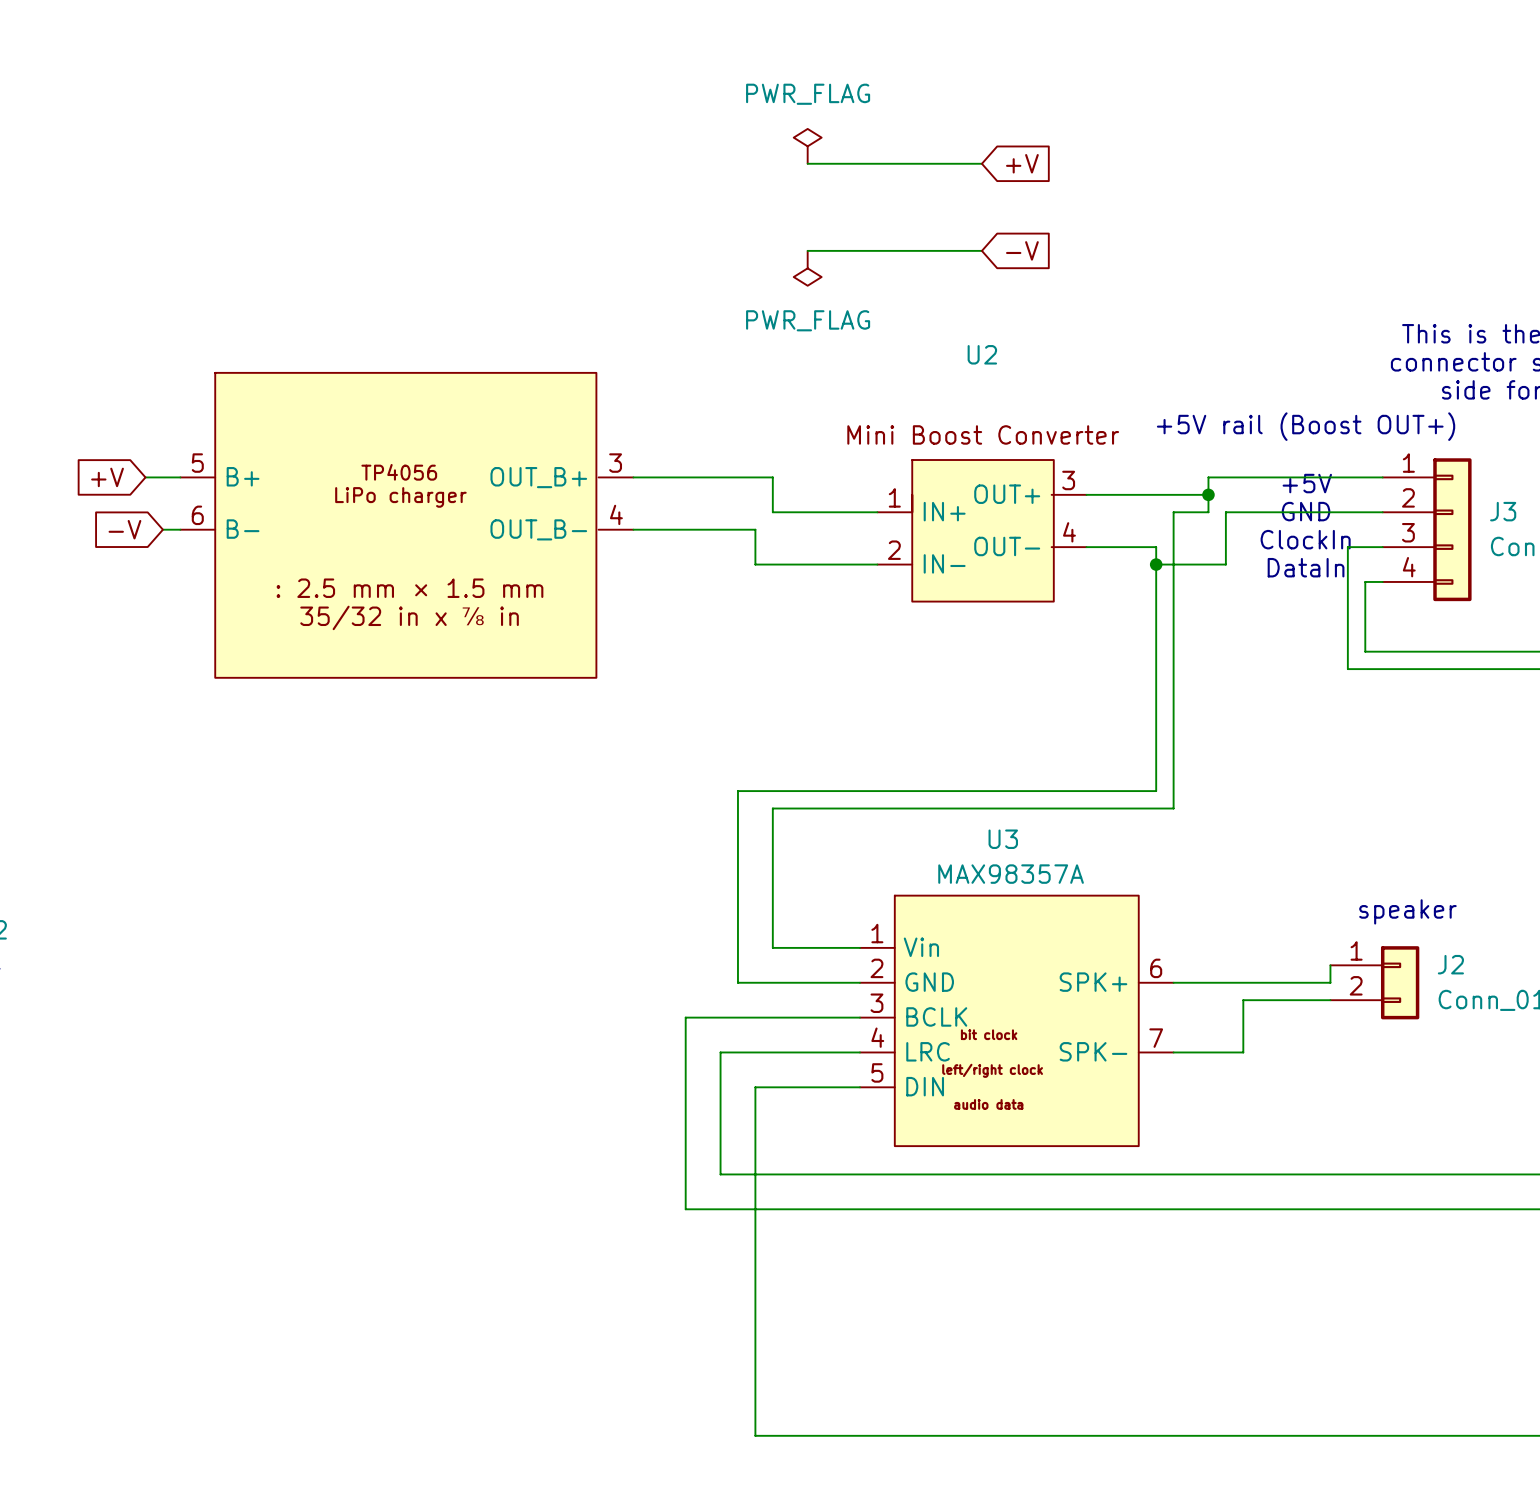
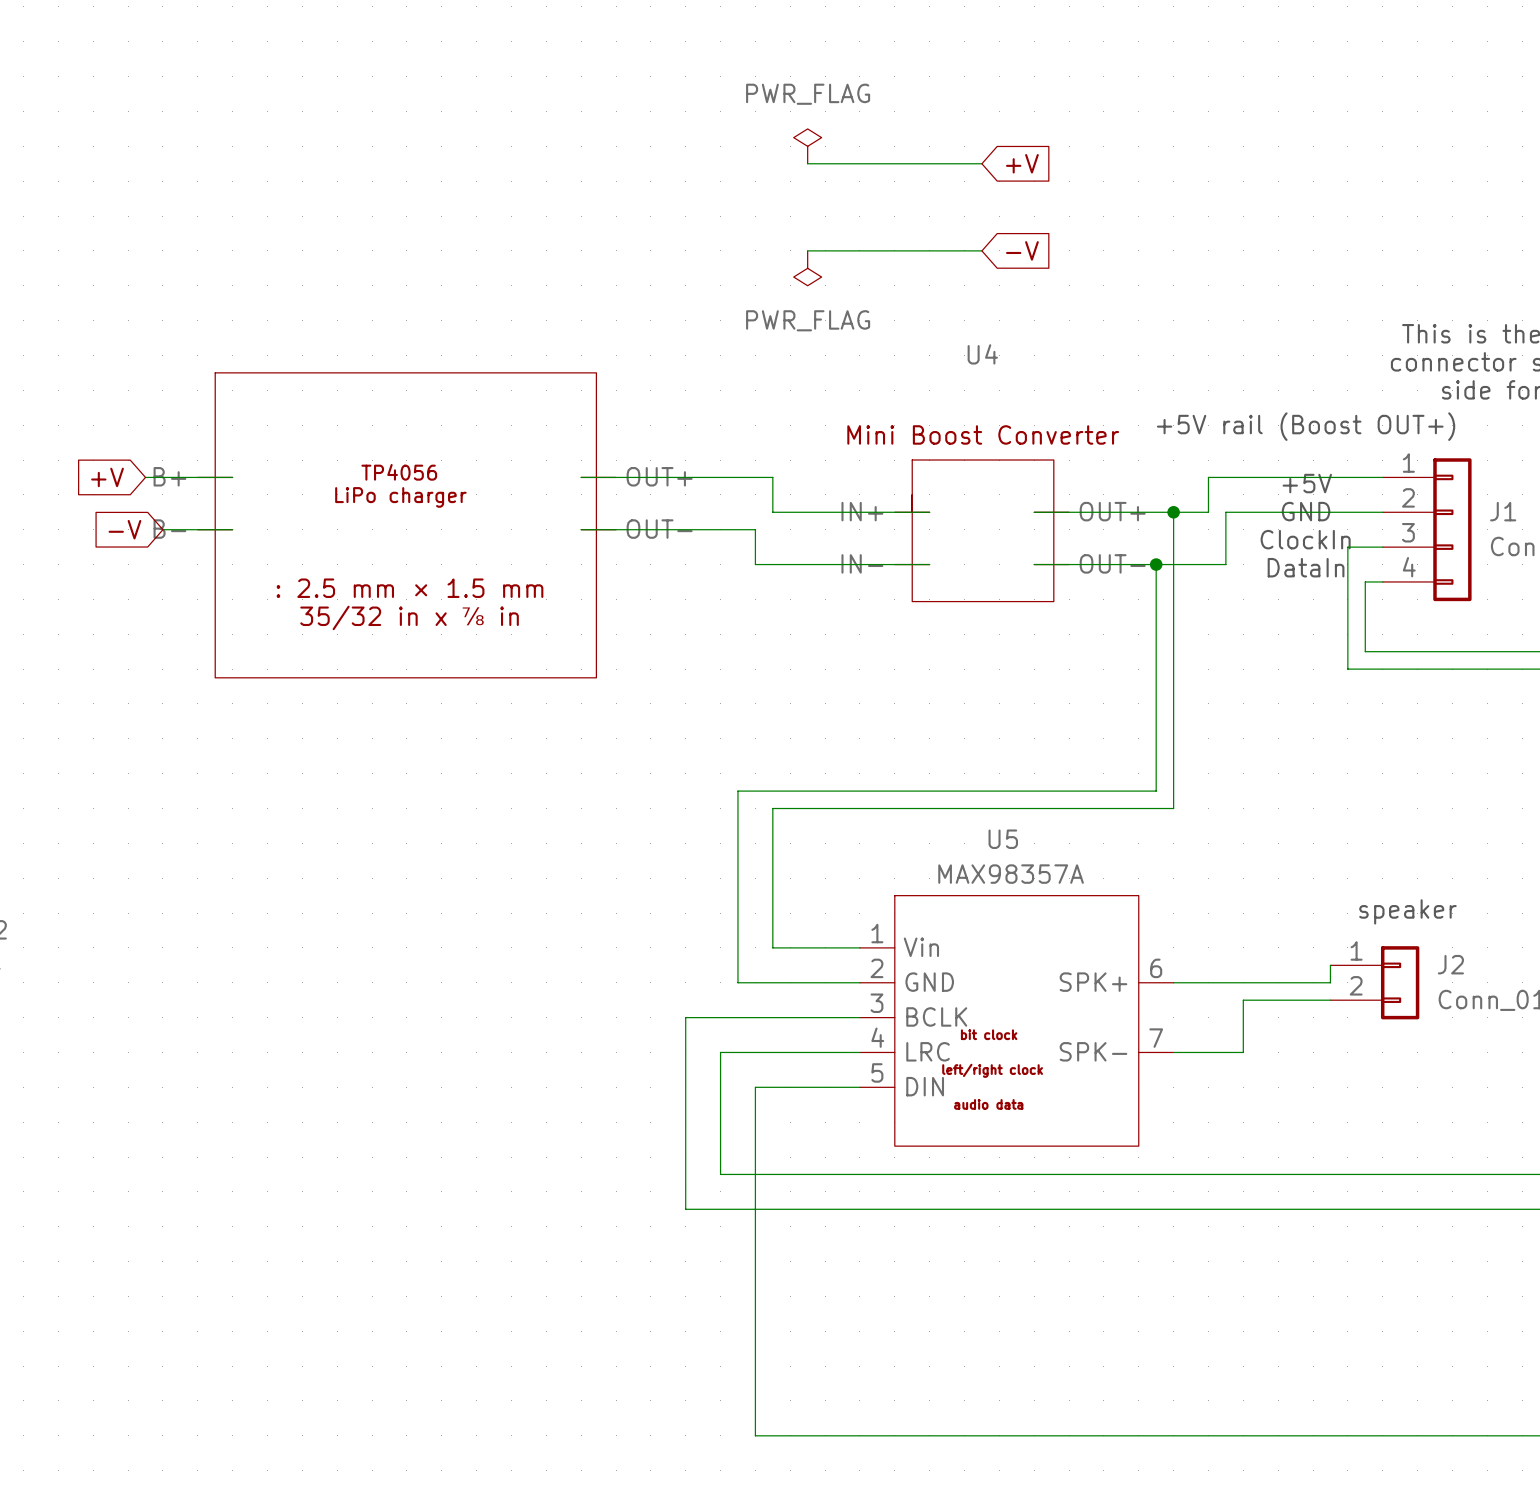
part symbol: [180, 372, 634, 678] -> [197, 372, 617, 678]
wire: (1086, 494) (1208, 494) -> none
junction position: (1208, 494) -> (1173, 512)
J3 name: J3 (1503, 511) -> J1 (1503, 511)
wire: none -> (1034, 512) (1173, 512)
U2: (981, 530) -> none
U4: none -> (981, 530)
wire: (1086, 547) (1156, 547) (1156, 564) -> (1034, 564) (1156, 564)
U3 name: U3 (1003, 839) -> U5 (1003, 839)

